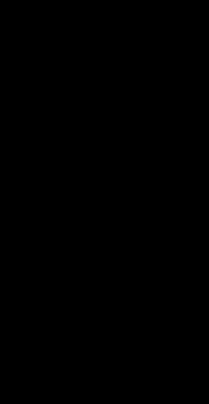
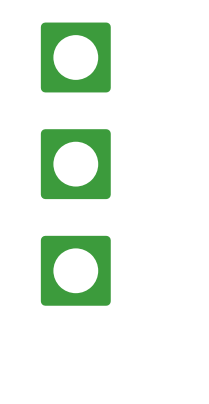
part: none -> (75, 57)
part: none -> (75, 164)
part: none -> (75, 270)

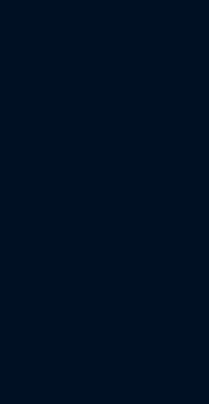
part: (75, 57) -> none
part: (75, 164) -> none
part: (75, 270) -> none

